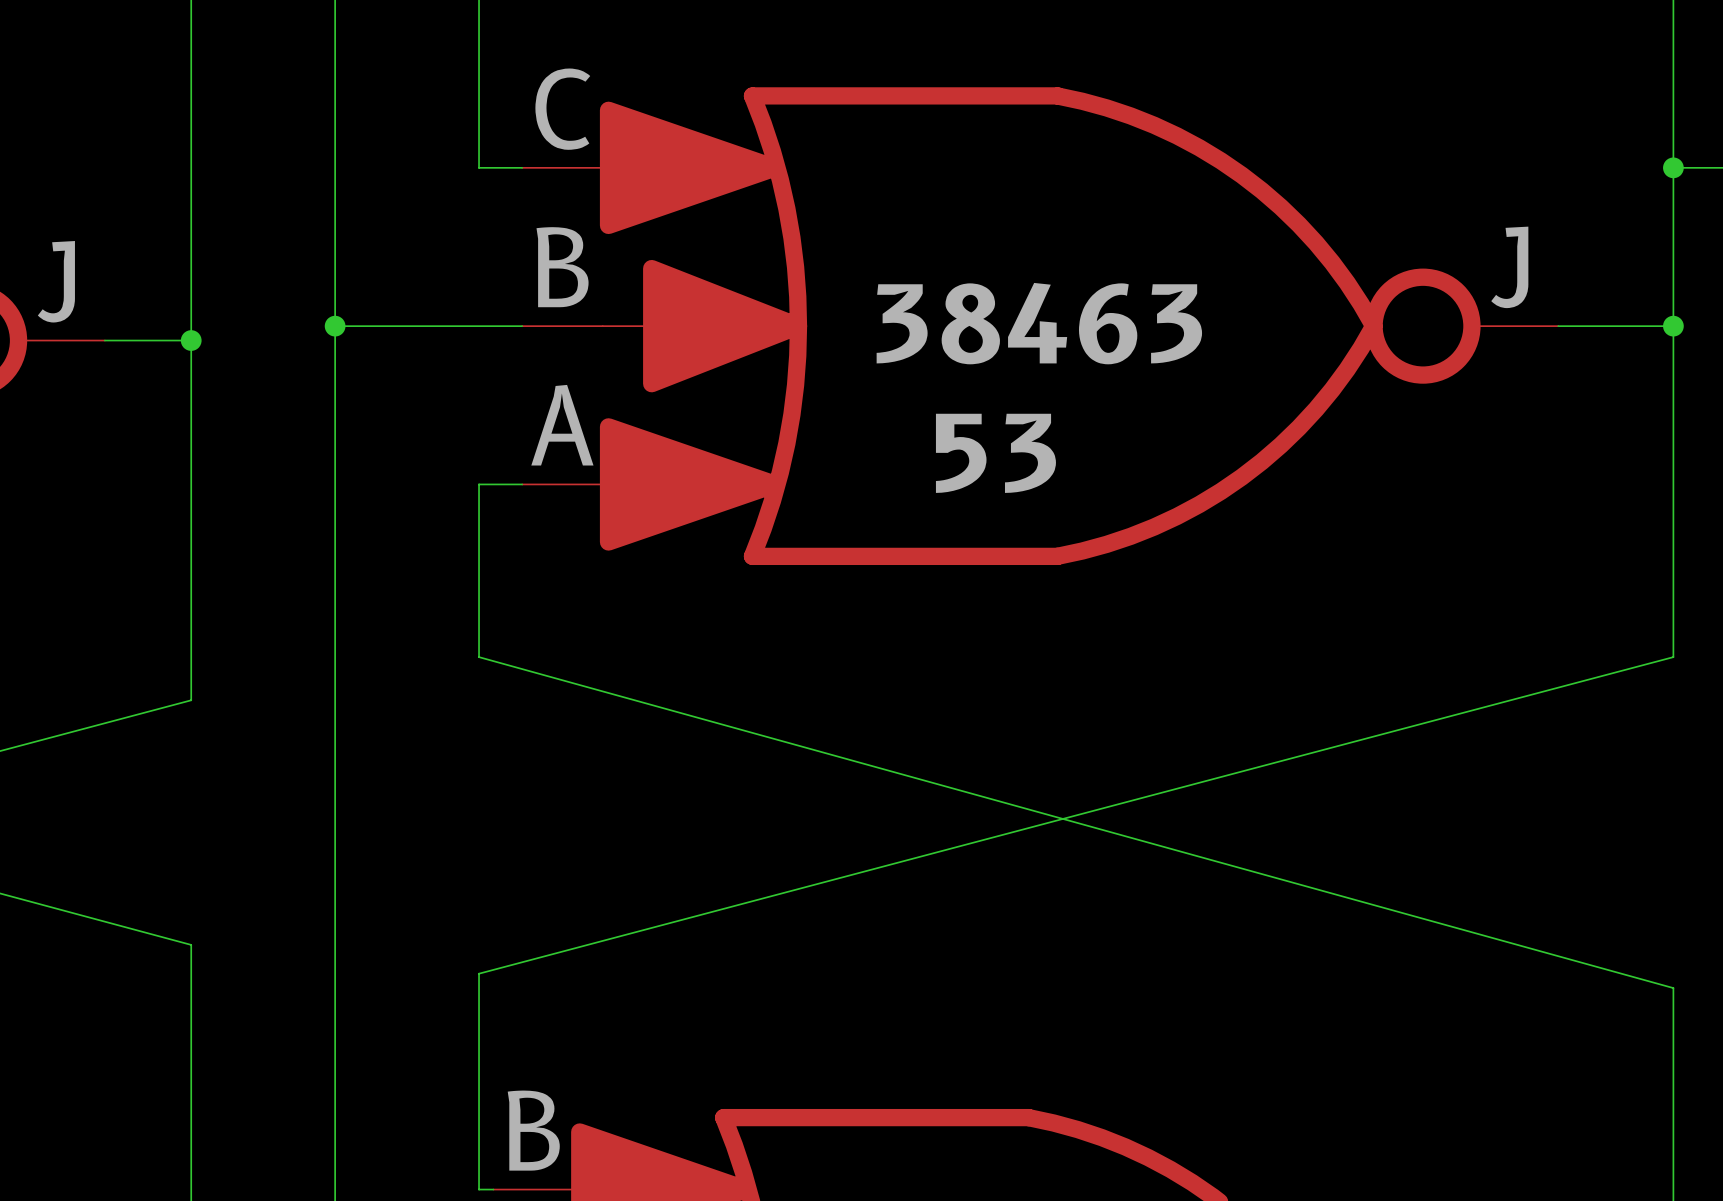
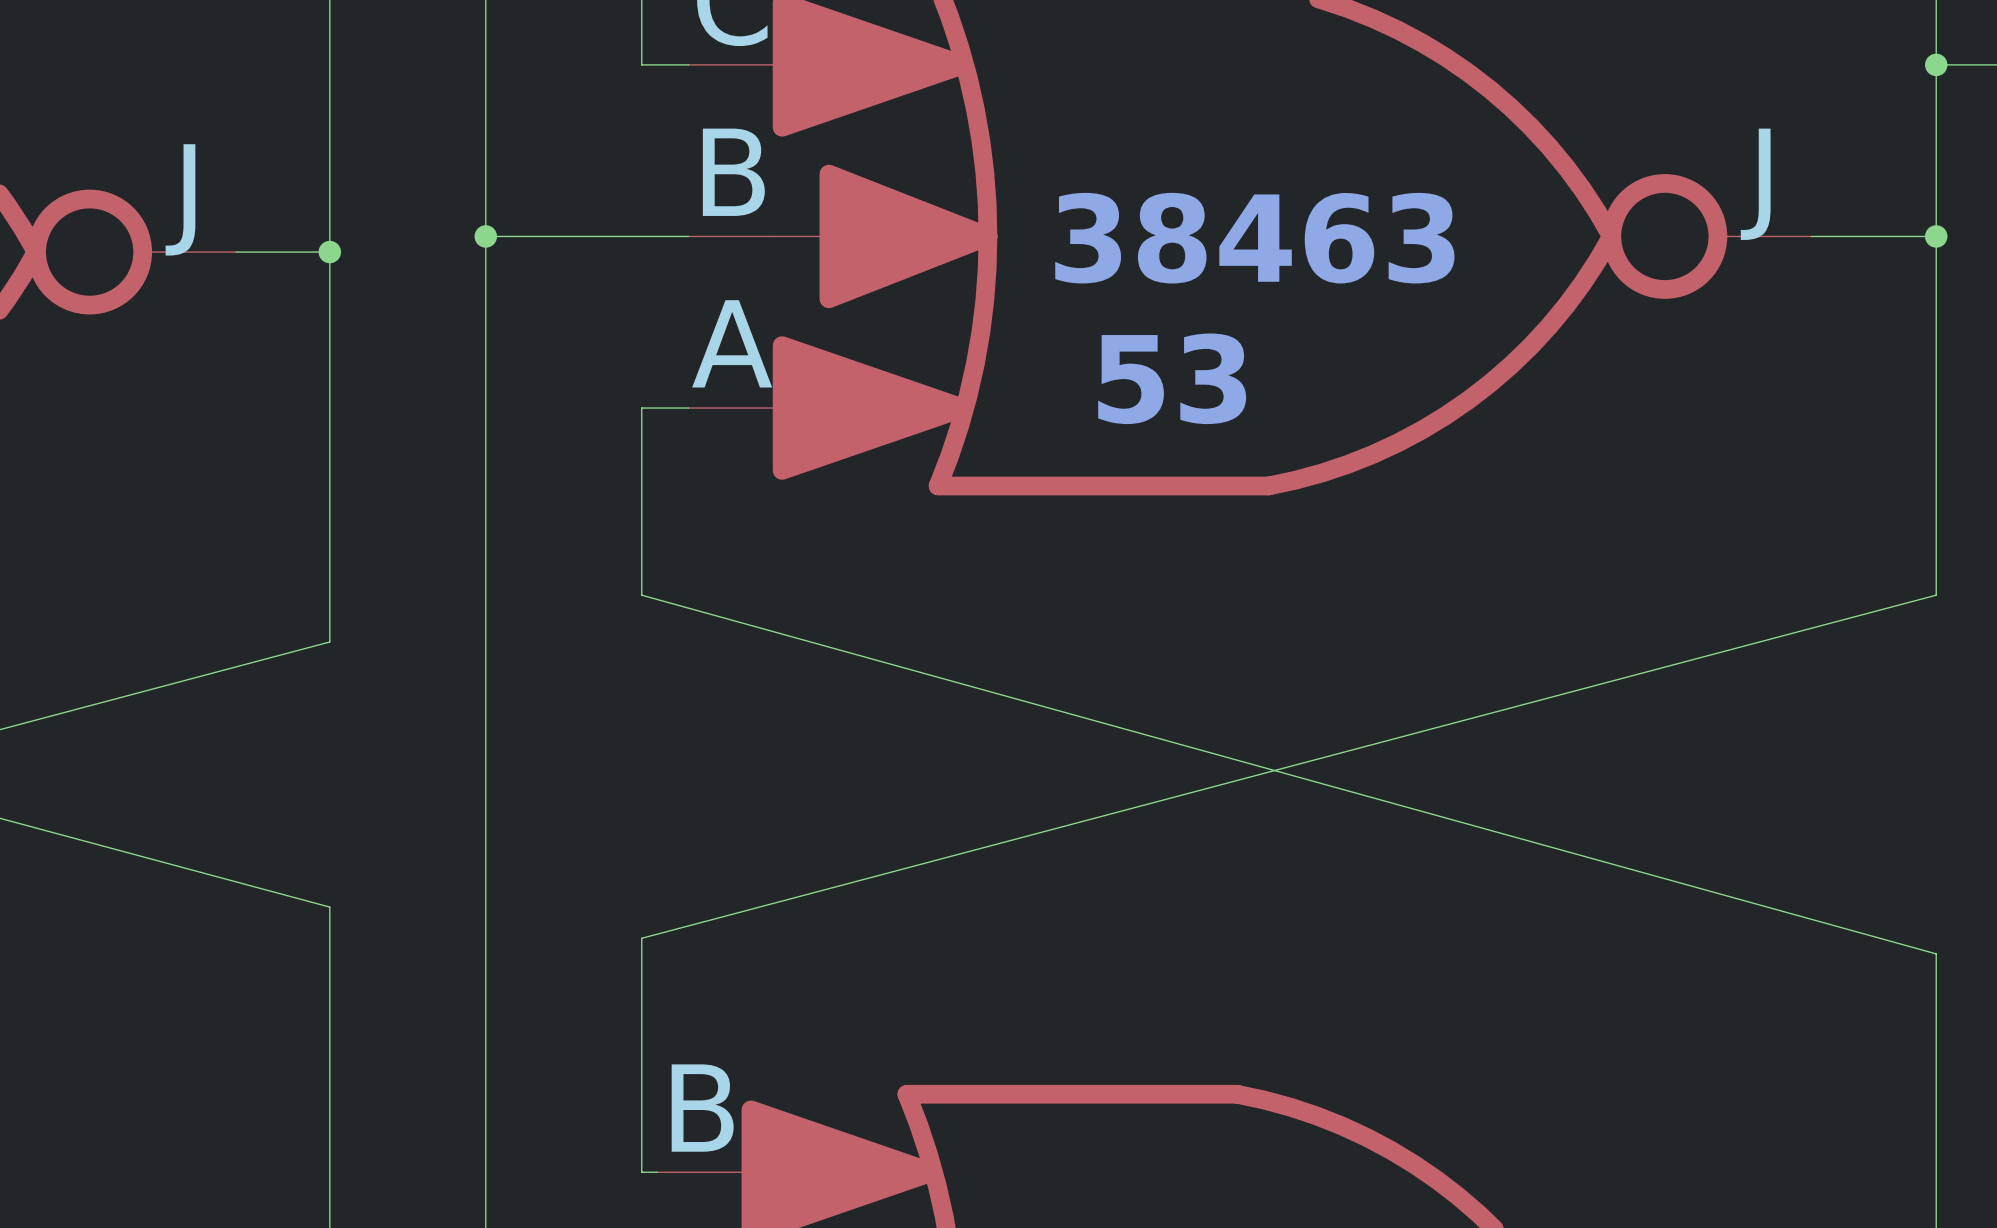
part text: 38463 (1039, 323) -> none
text: none -> 38463 (1254, 238)
part text: 53 (995, 453) -> none
text: none -> 53 (1172, 378)

